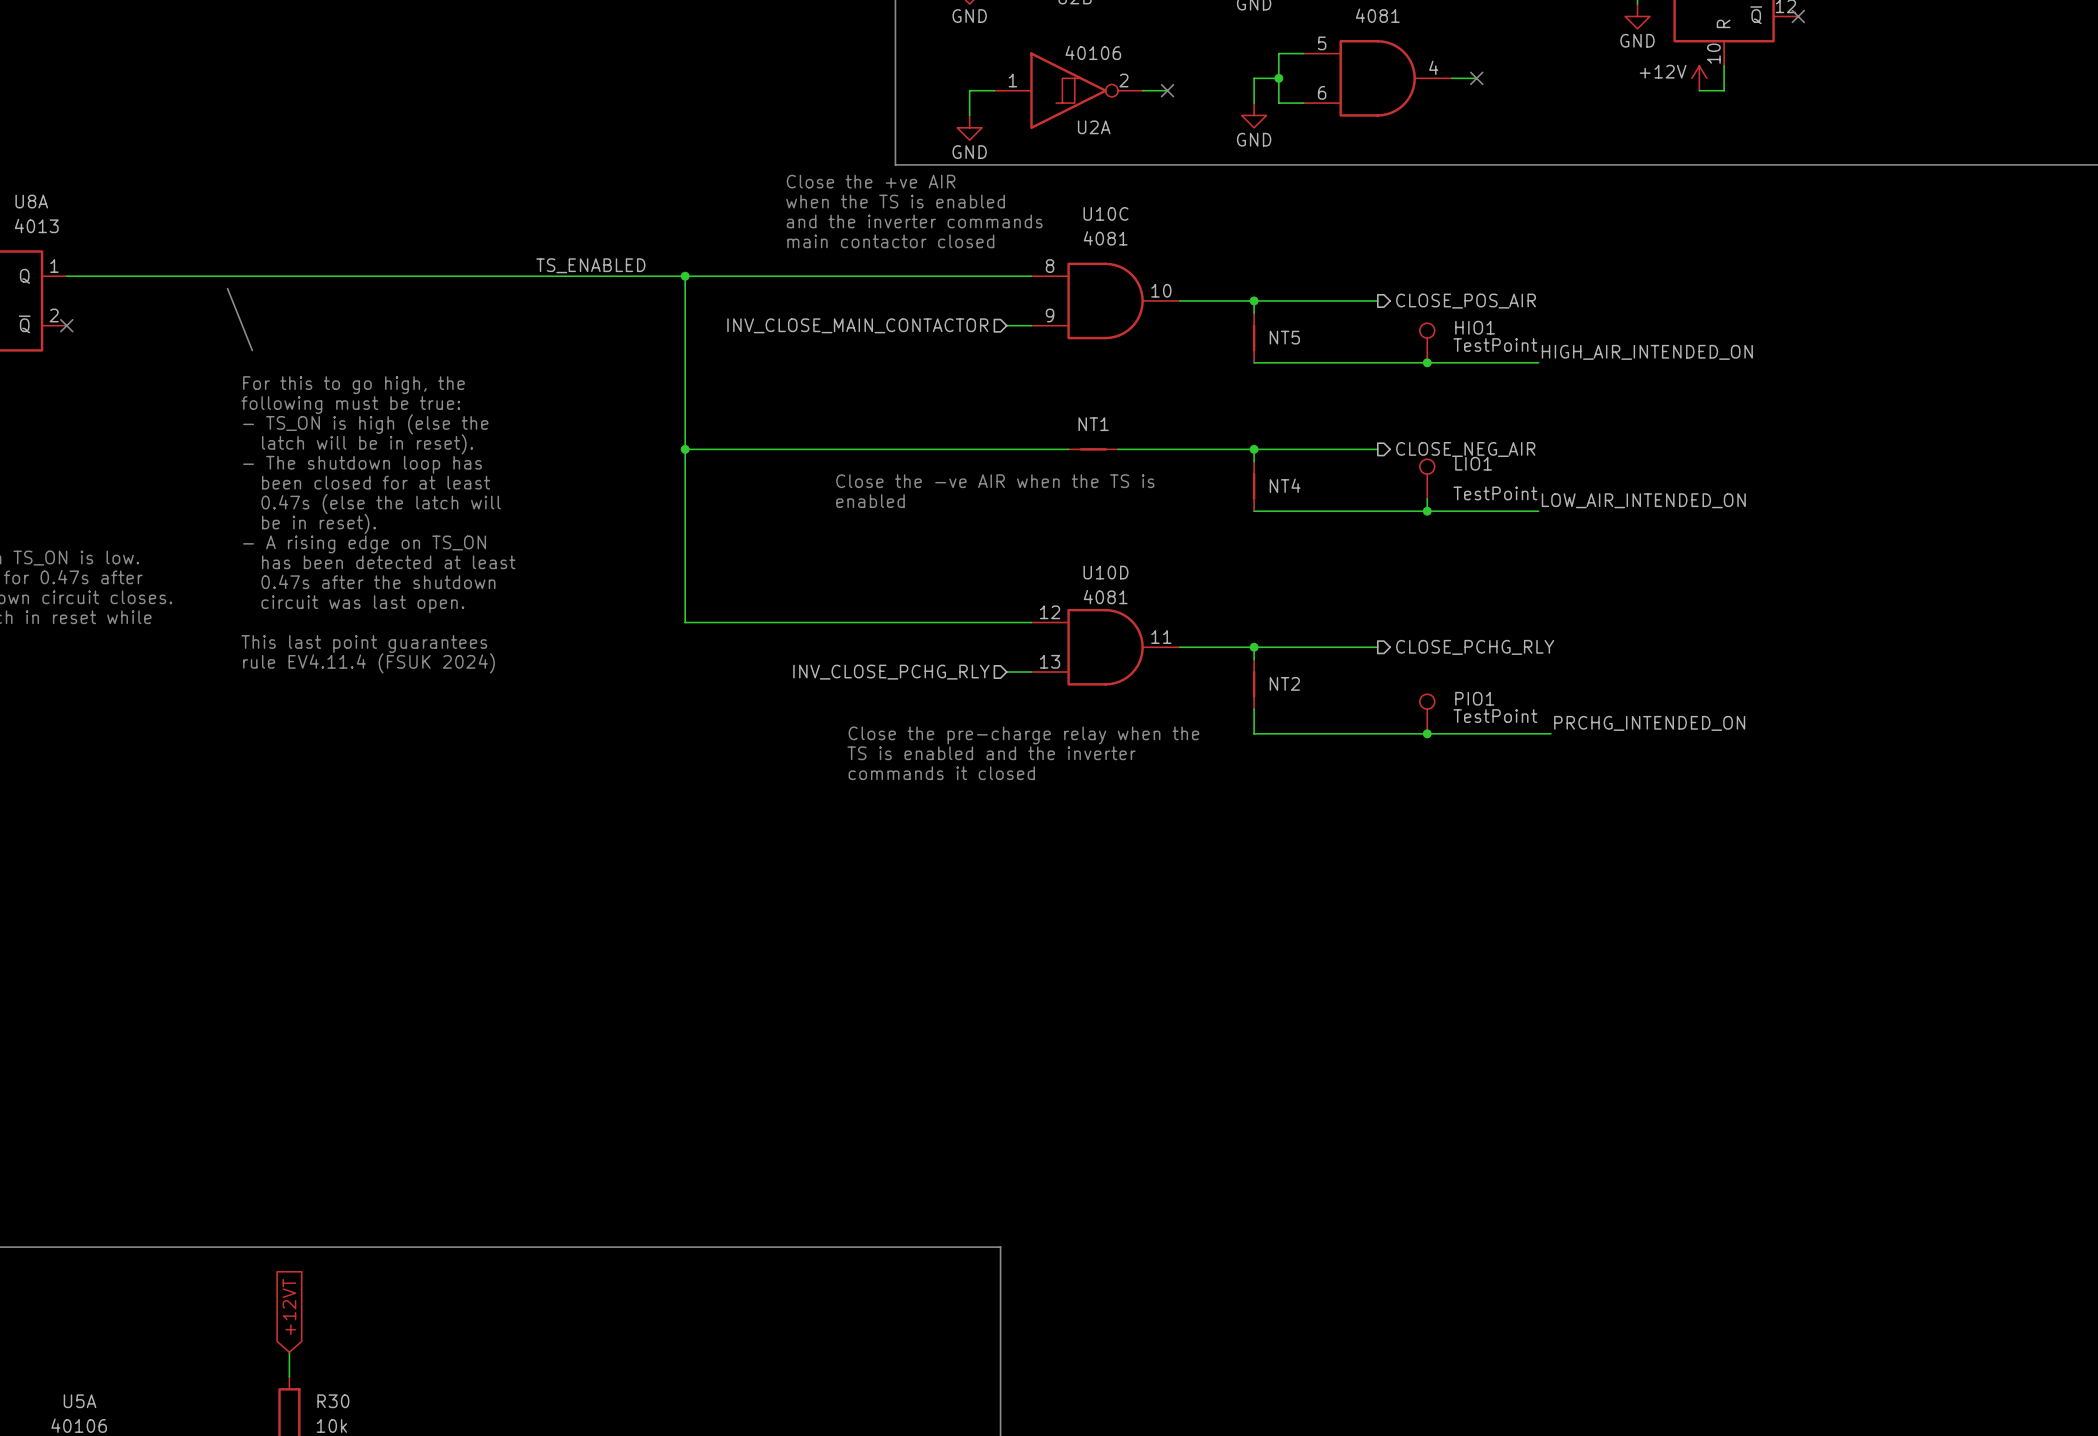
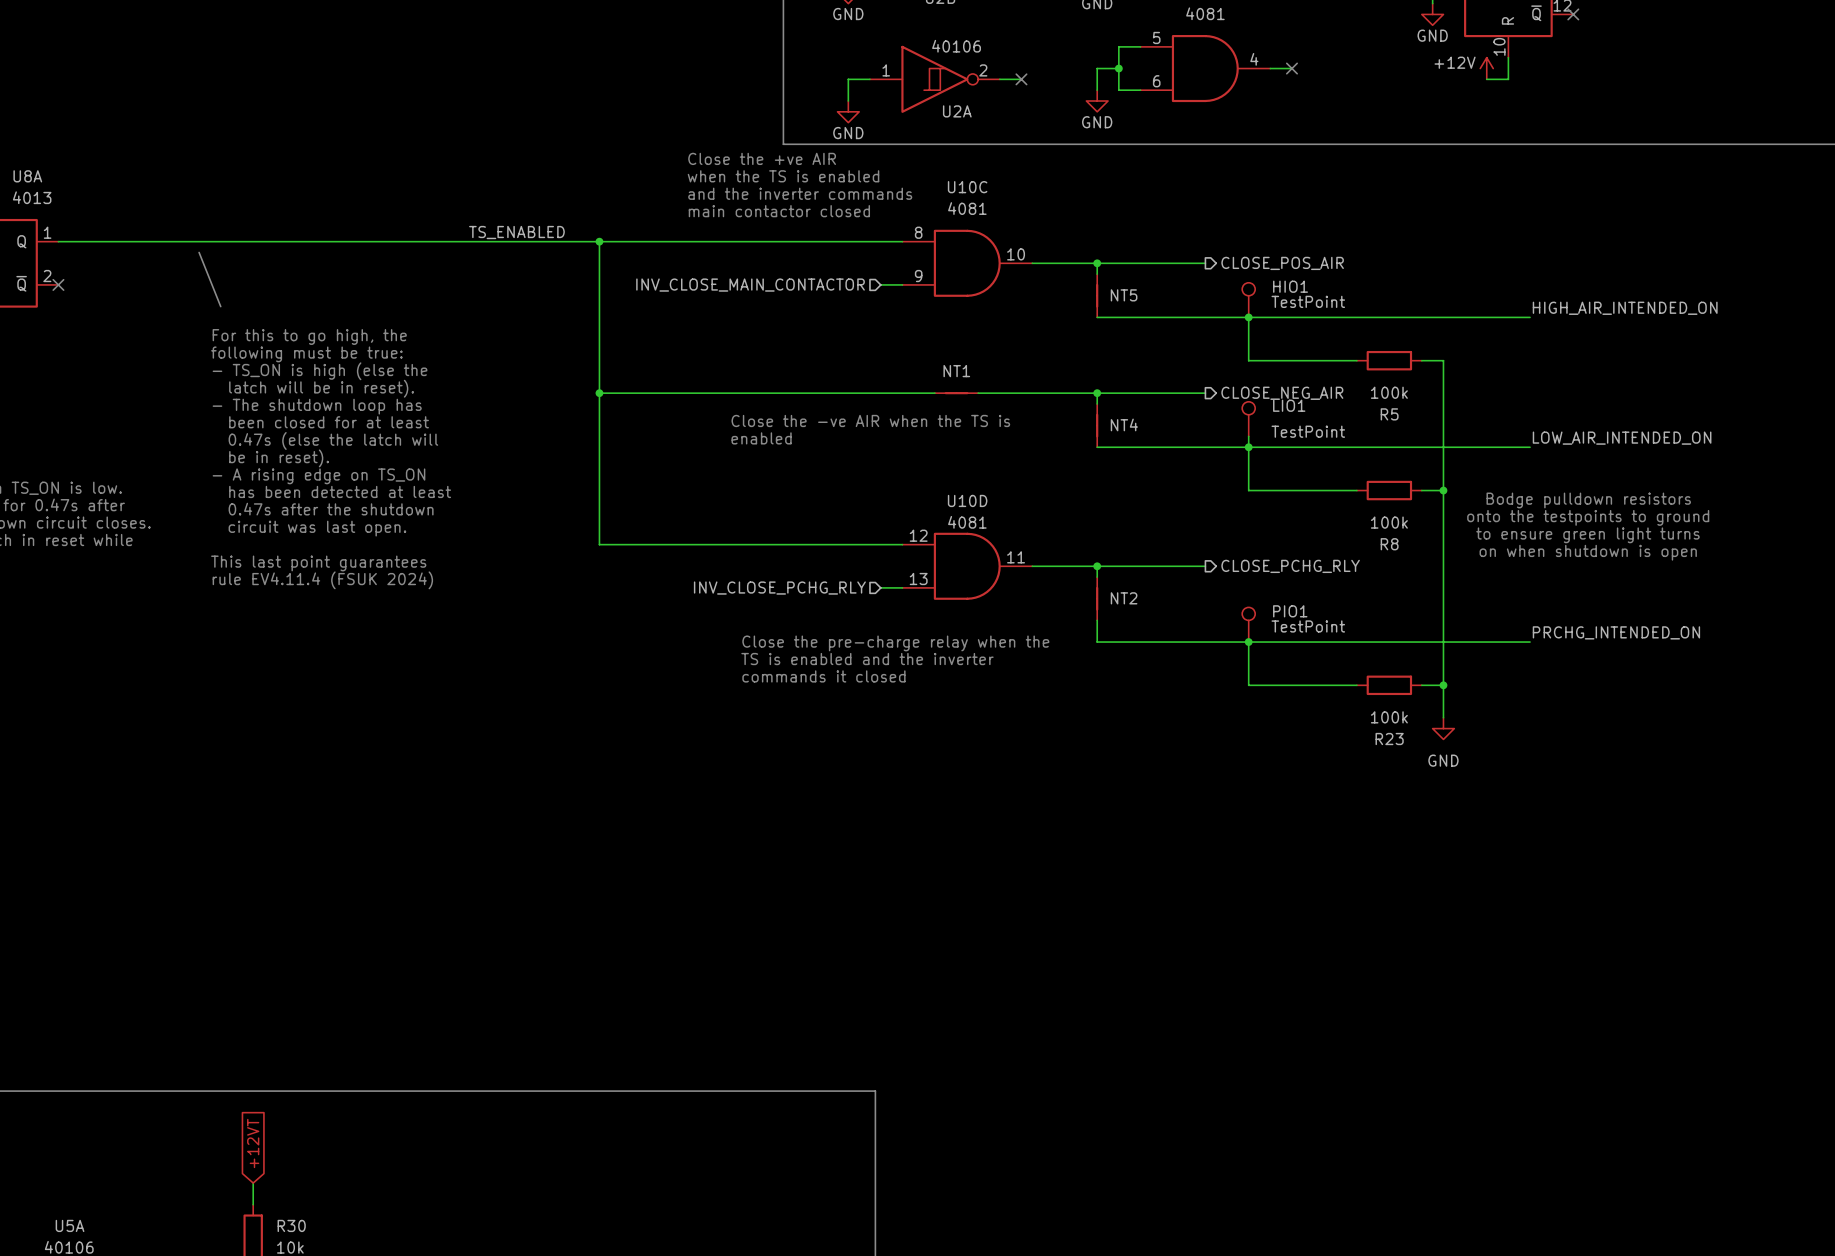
label position: HIGH_AIR_INTENDED_ON (1647, 352) -> HIGH_AIR_INTENDED_ON (1625, 308)
wire: none -> (1248, 317) (1248, 360) (1356, 360)
wire: none -> (1346, 317) (1530, 317)
R5: none -> 100k (1389, 360)
wire: none -> (1421, 360) (1443, 360) (1443, 717)
label position: LOW_AIR_INTENDED_ON (1643, 500) -> LOW_AIR_INTENDED_ON (1622, 438)
wire: none -> (1248, 447) (1248, 490) (1356, 490)
wire: none -> (1346, 447) (1530, 447)
R8: none -> 100k (1389, 490)
wire: none -> (1421, 490) (1443, 490)
junction: none -> (1443, 490)
text: none -> Bodge pulldown resistors (1588, 500)
text: none -> onto the testpoints to ground (1588, 517)
text: none -> to ensure green light turns (1587, 535)
text: none -> on when shutdown is open (1588, 552)
label position: PRCHG_INTENDED_ON (1649, 723) -> PRCHG_INTENDED_ON (1616, 632)
wire: none -> (1248, 642) (1248, 685) (1356, 685)
wire: none -> (1356, 642) (1530, 642)
R23: none -> 100k (1389, 685)
wire: none -> (1421, 685) (1443, 685)
junction: none -> (1443, 685)
power symbol: none -> GND (1443, 728)

